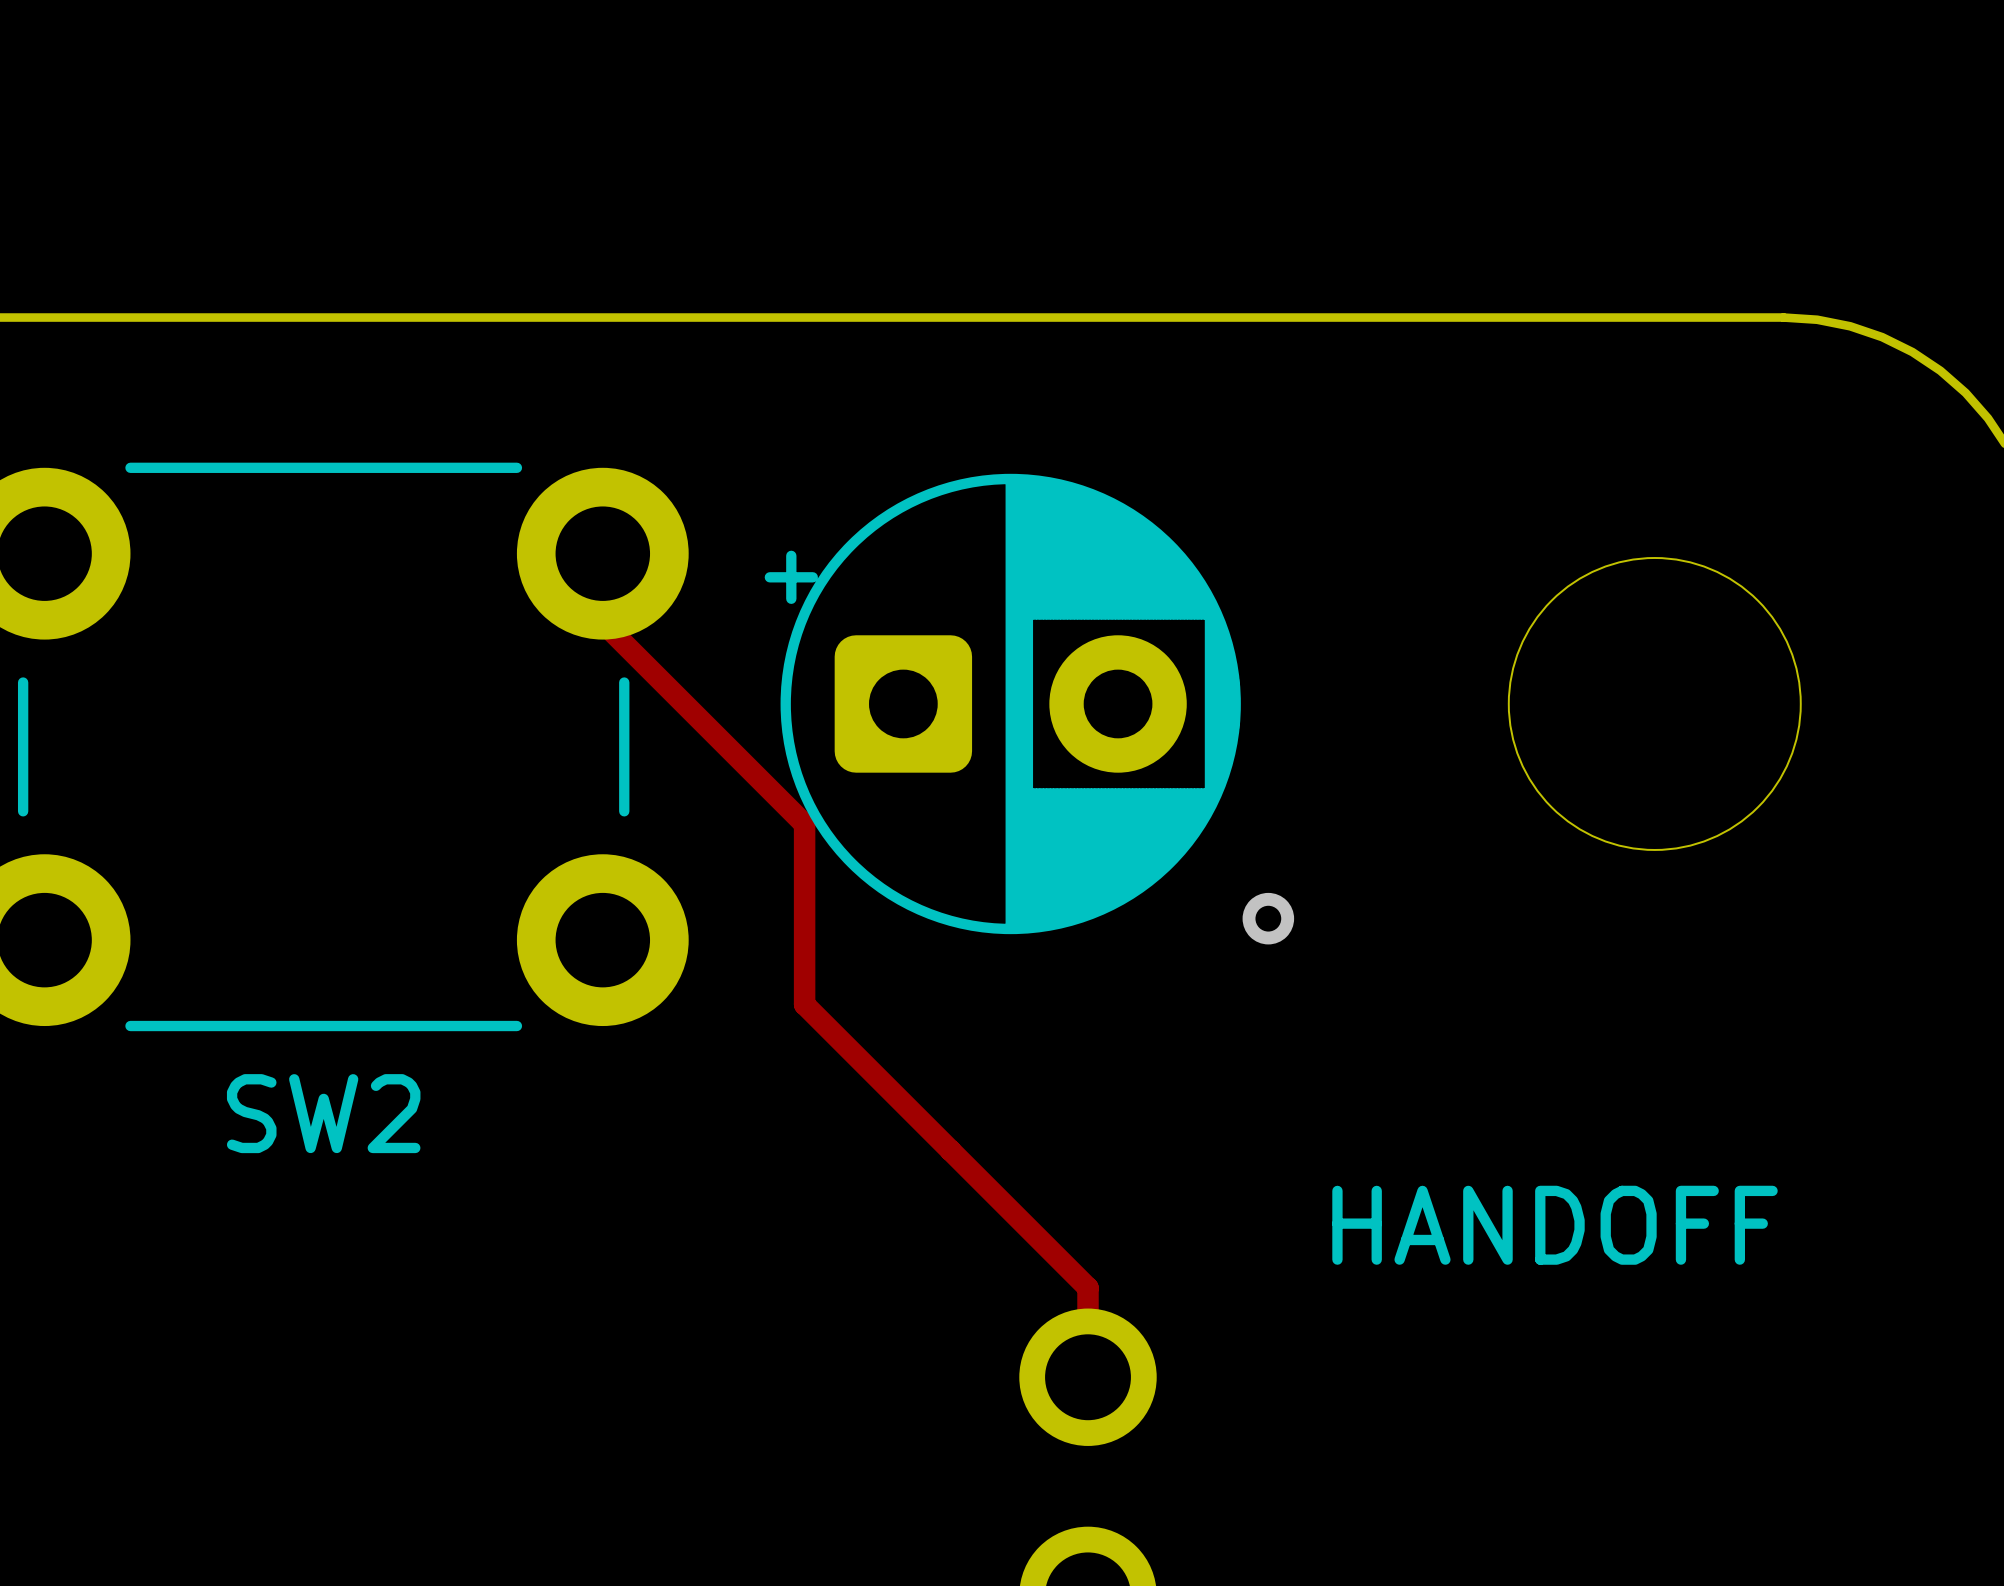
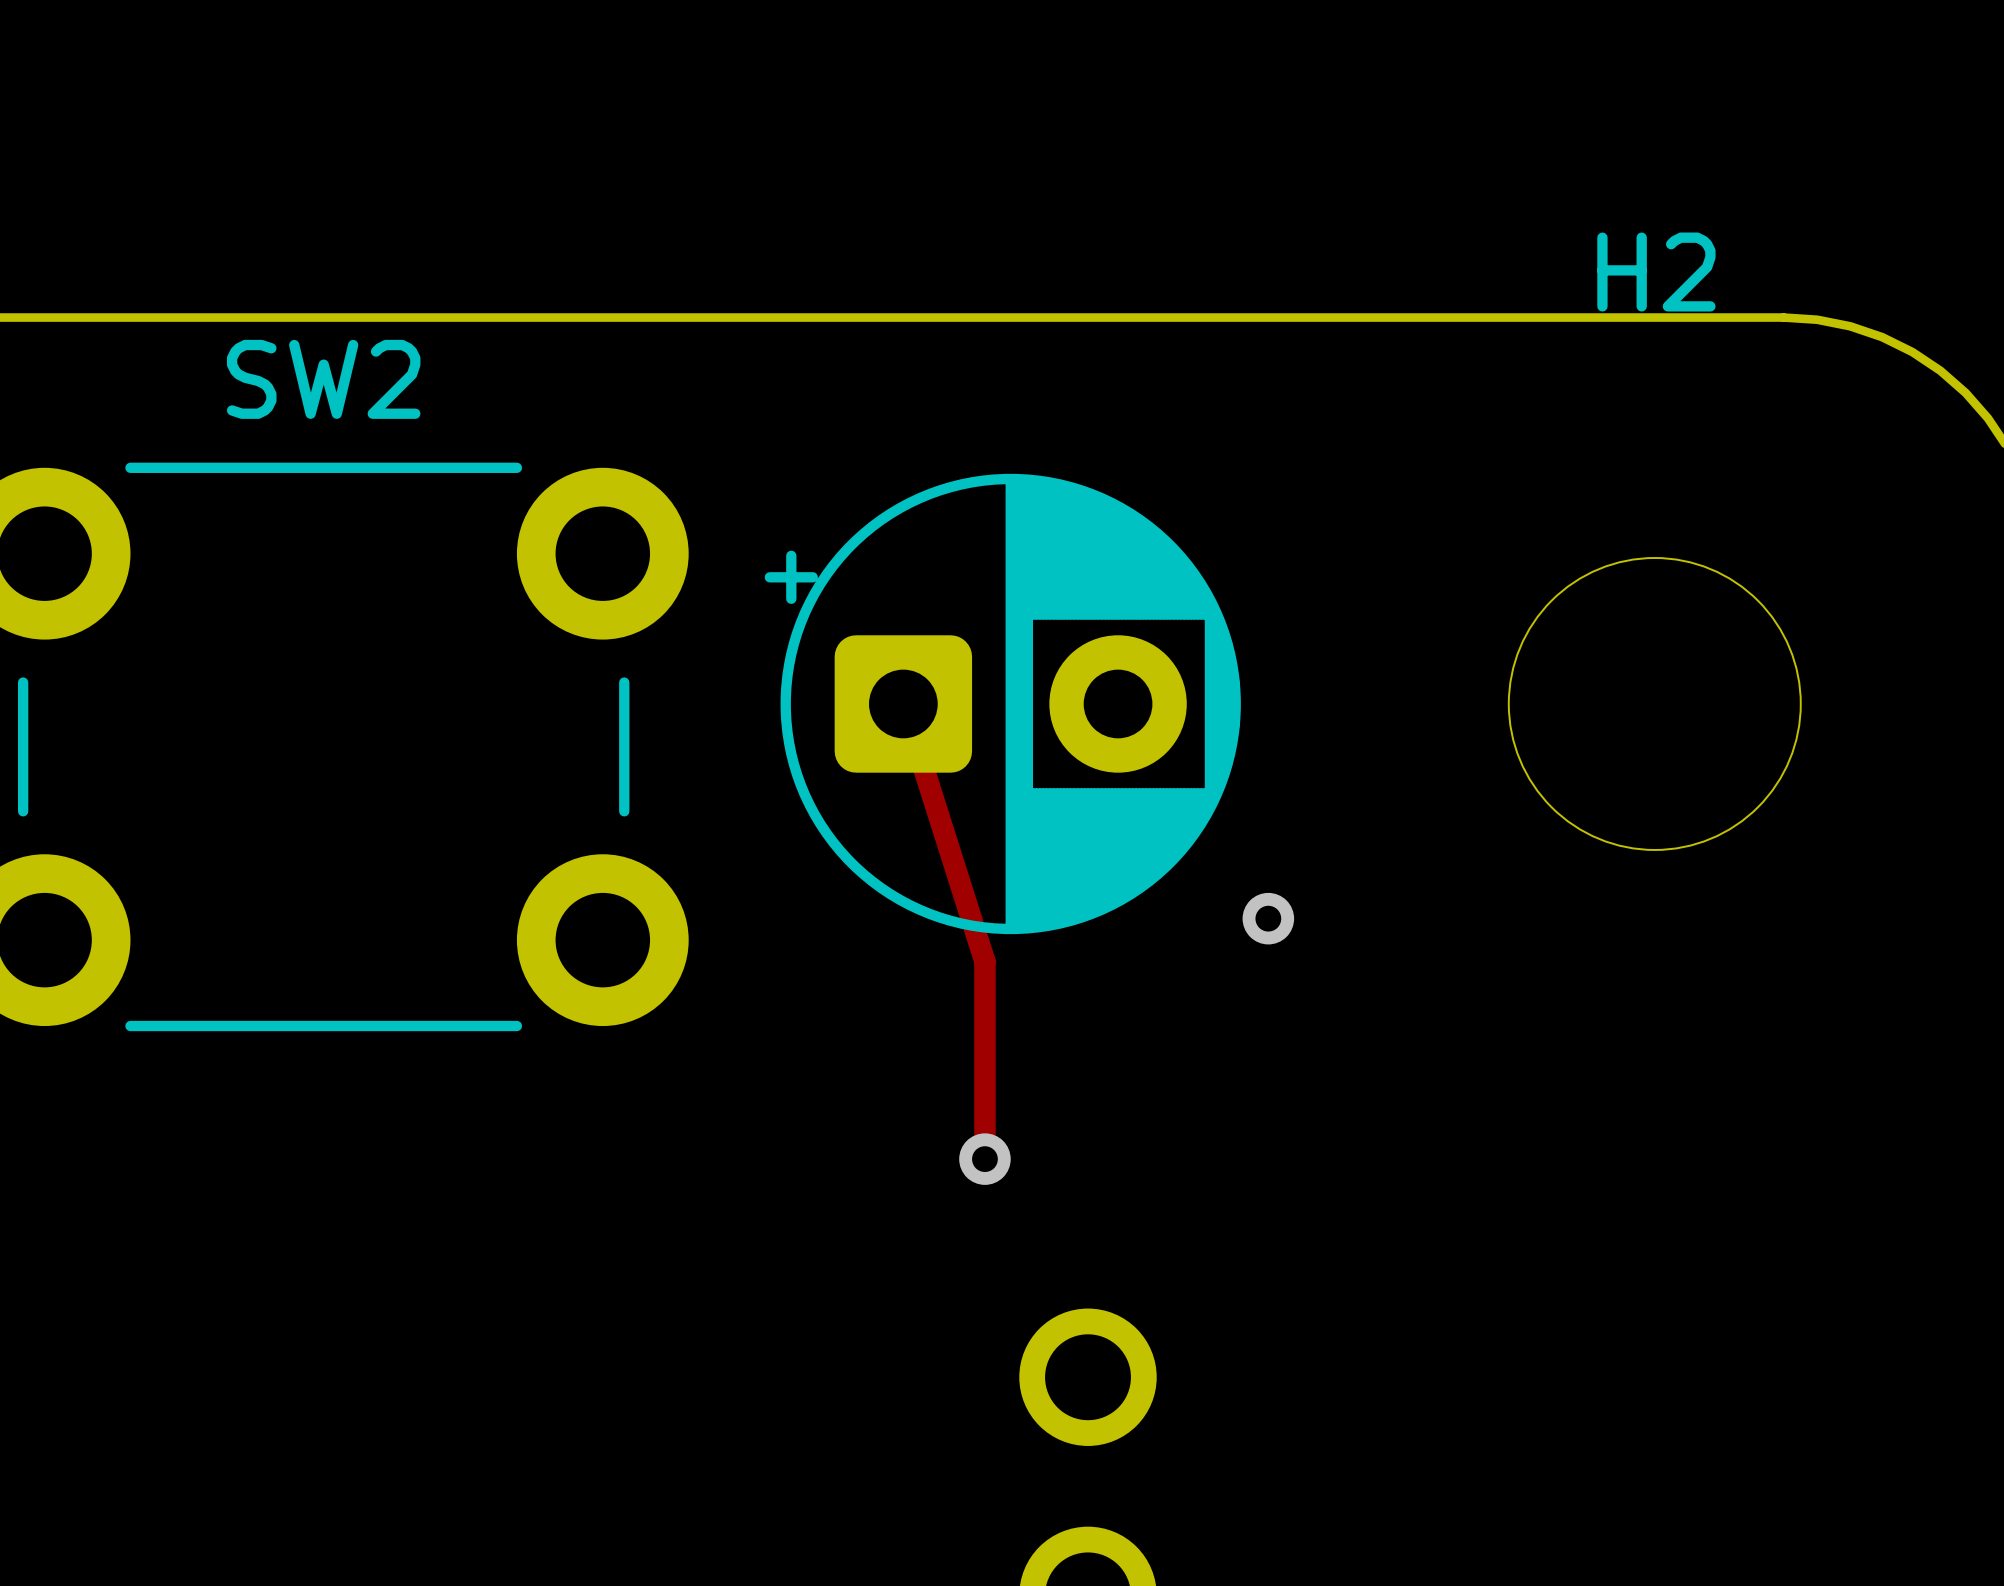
H2 name: none -> H2 (1656, 272)
track: (602, 553) (602, 622) (804, 824) (804, 1004) (1088, 1287) (1088, 1377) -> none
track: none -> (903, 703) (984, 961) (984, 1159)
SW2 name position: SW2 (323, 1113) -> SW2 (323, 379)
via: none -> (984, 1159)
text: HANDOFF (1555, 1225) -> none

